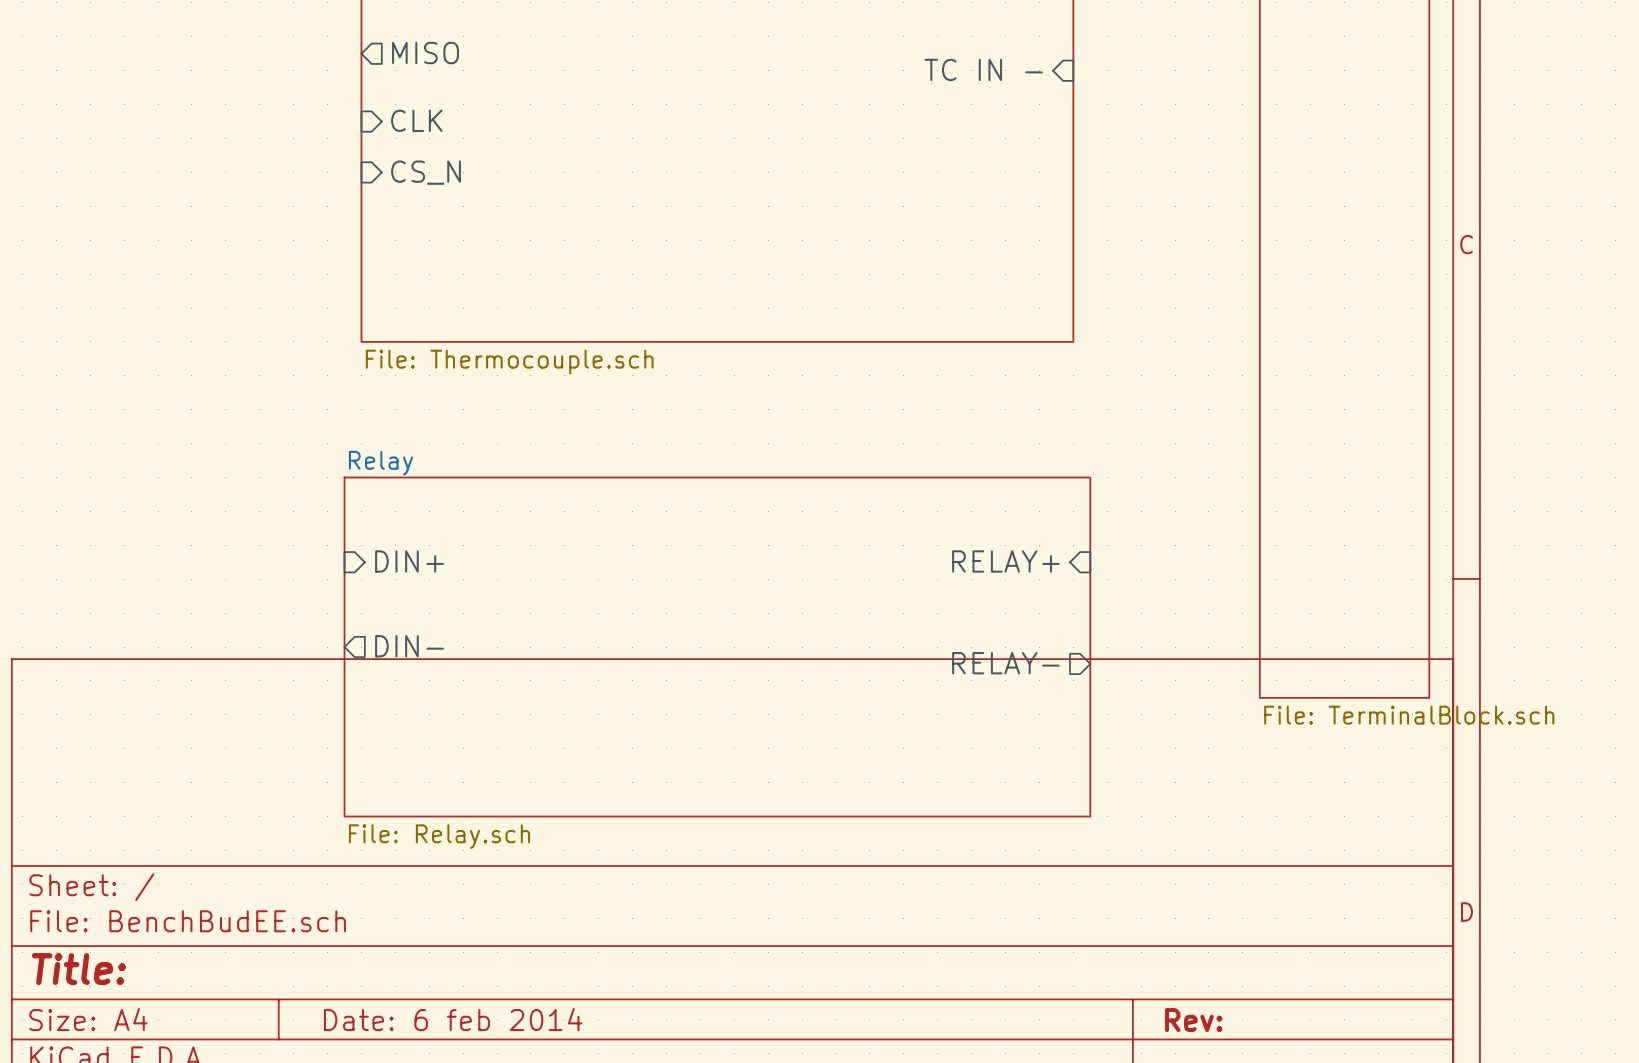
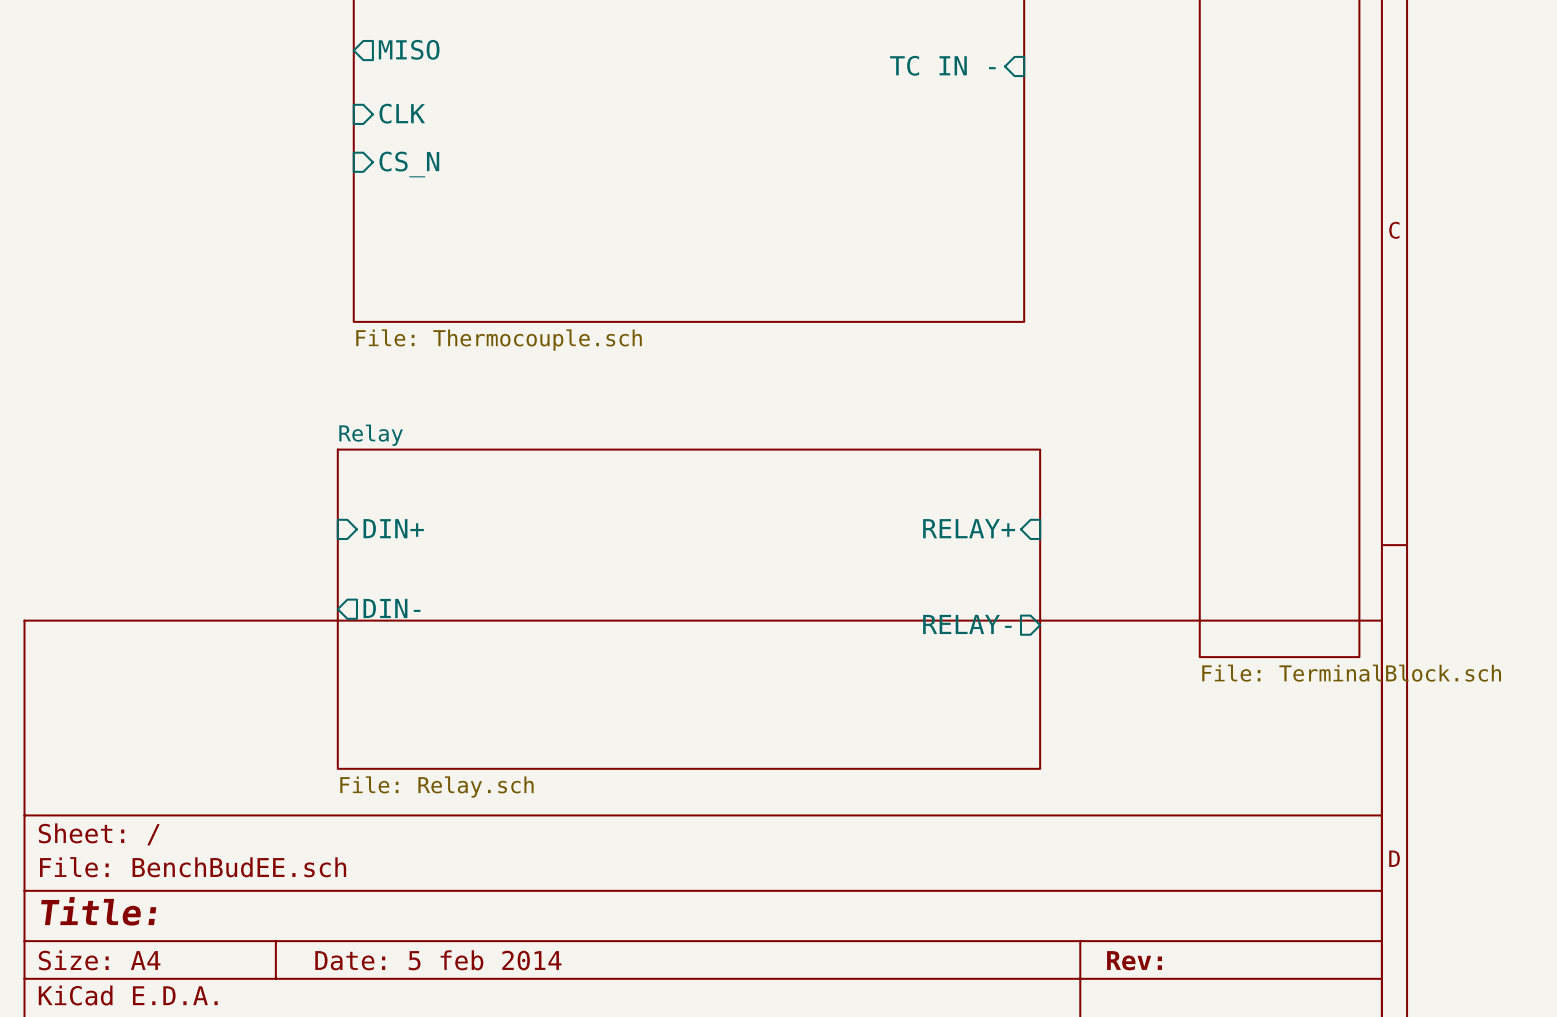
title block: Date: 6 feb 2014 (453, 1019) -> Date: 5 feb 2014 (438, 960)

